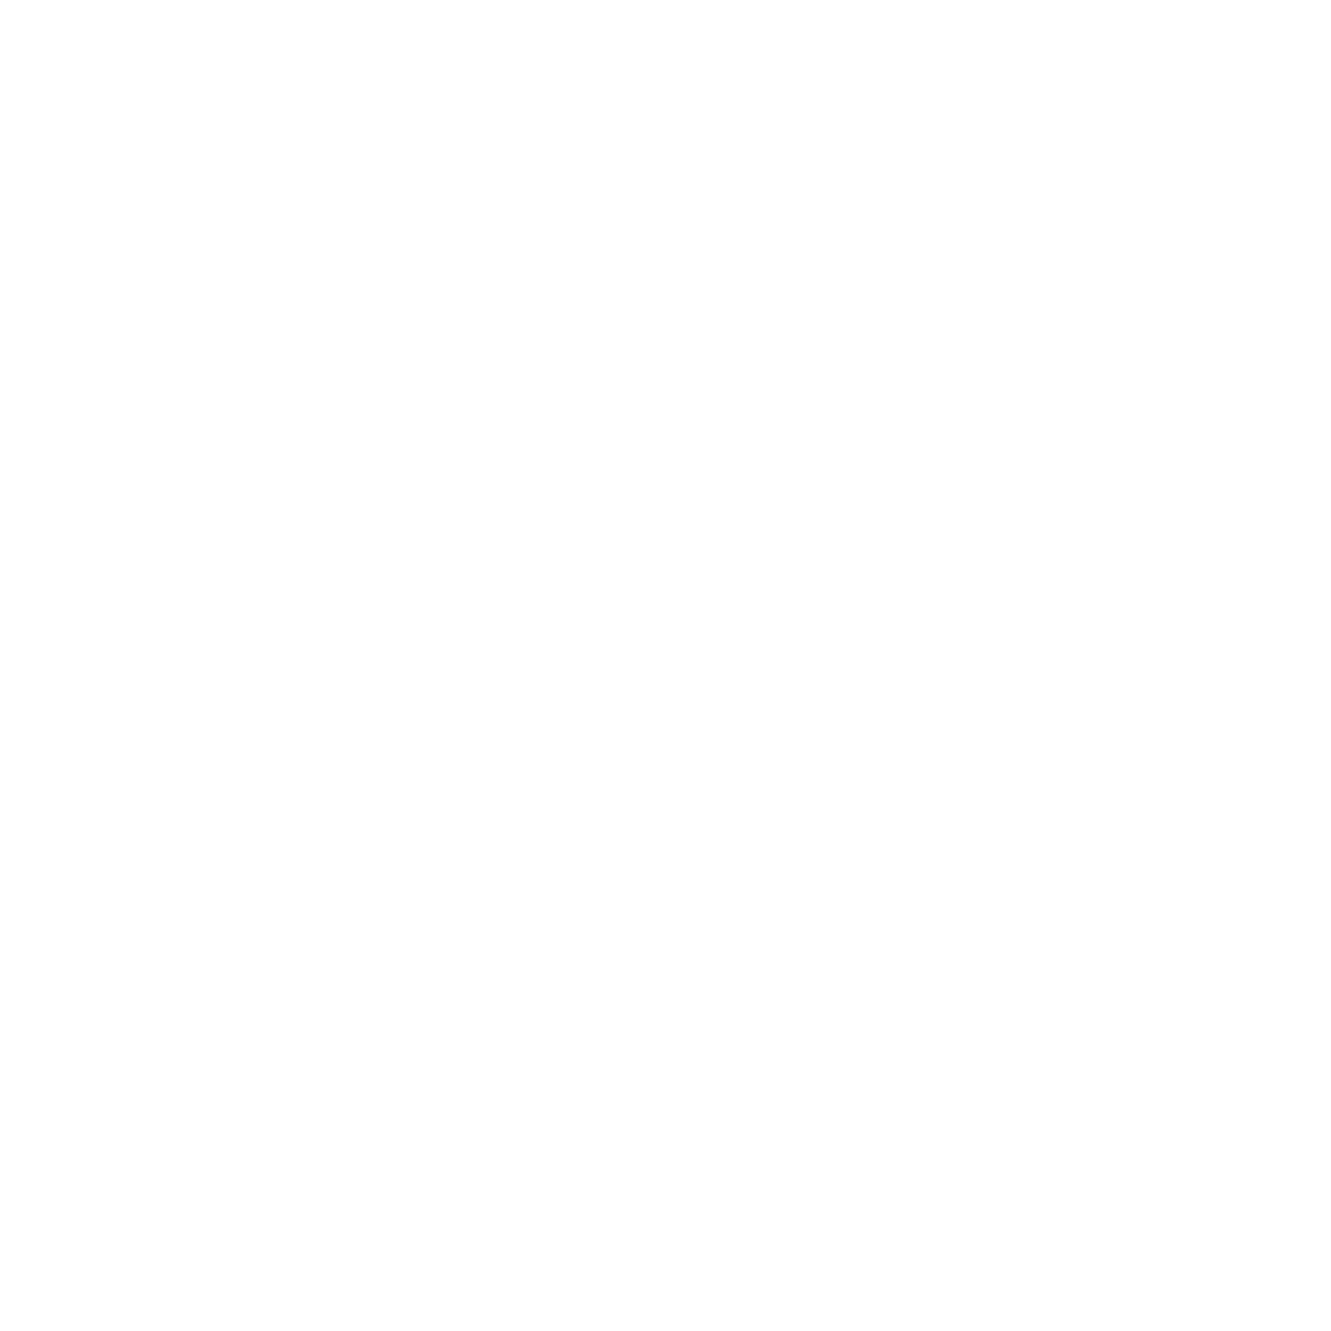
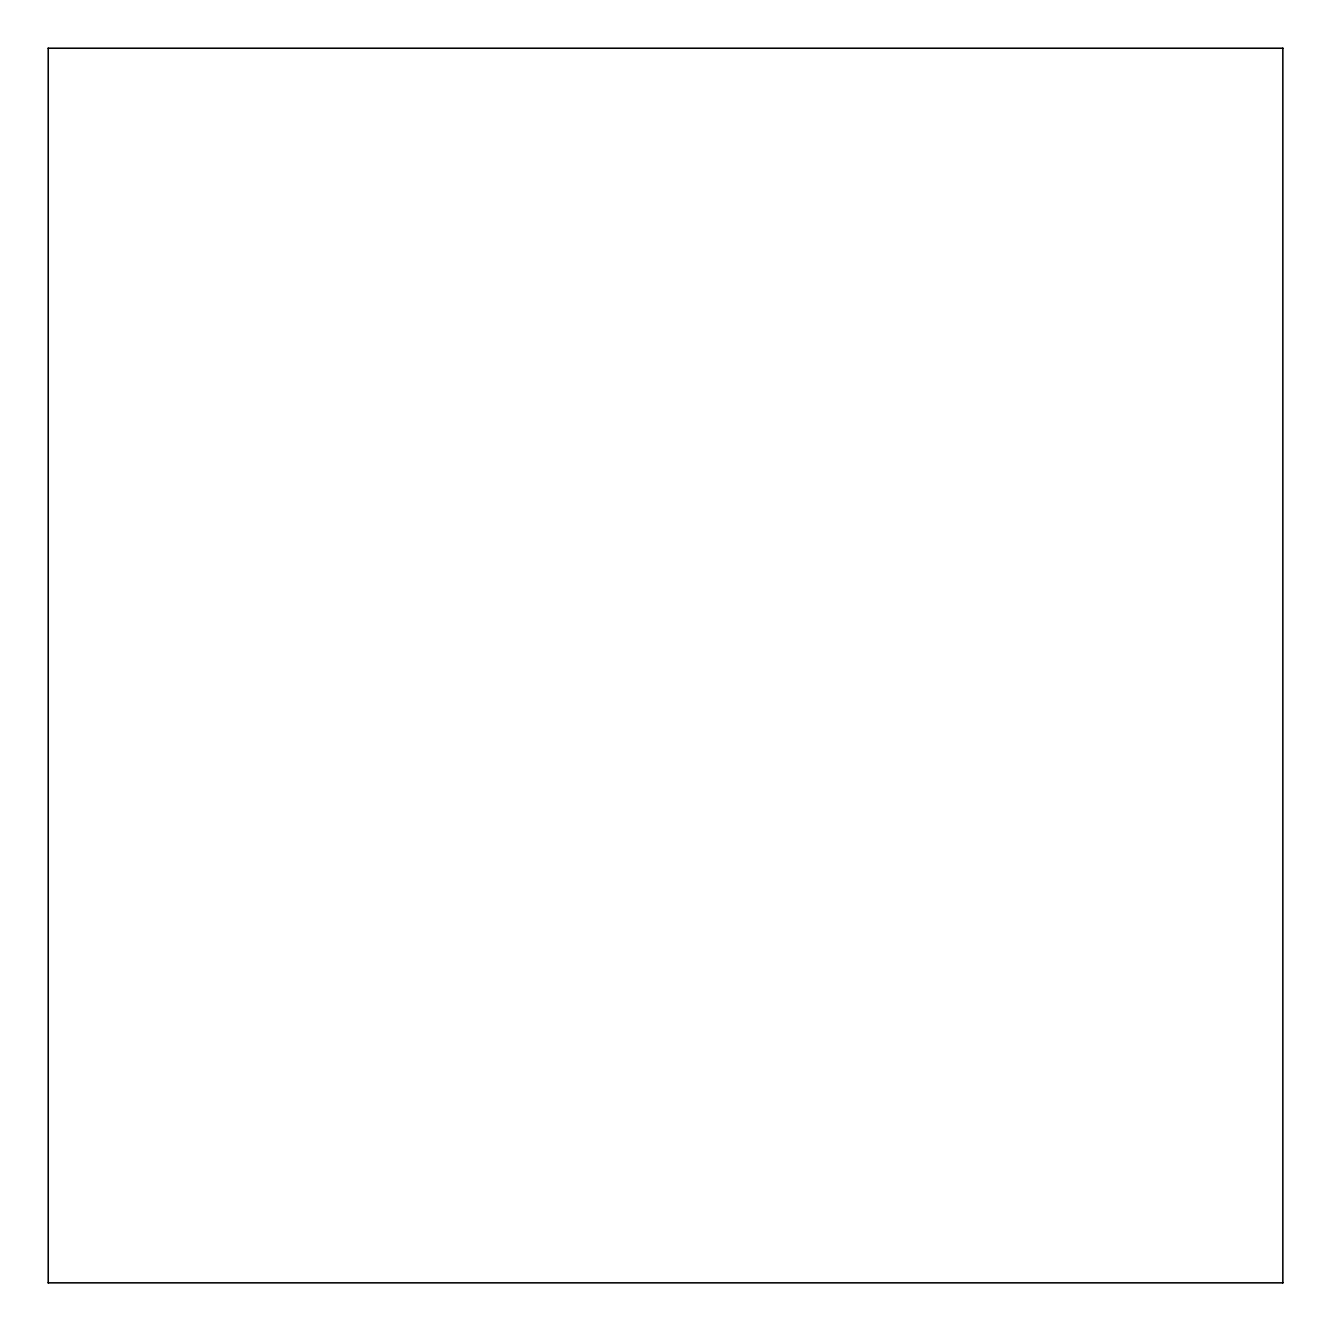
board edge: none -> (48, 48) (1282, 48) (1282, 1282) (48, 1282) (48, 48)

